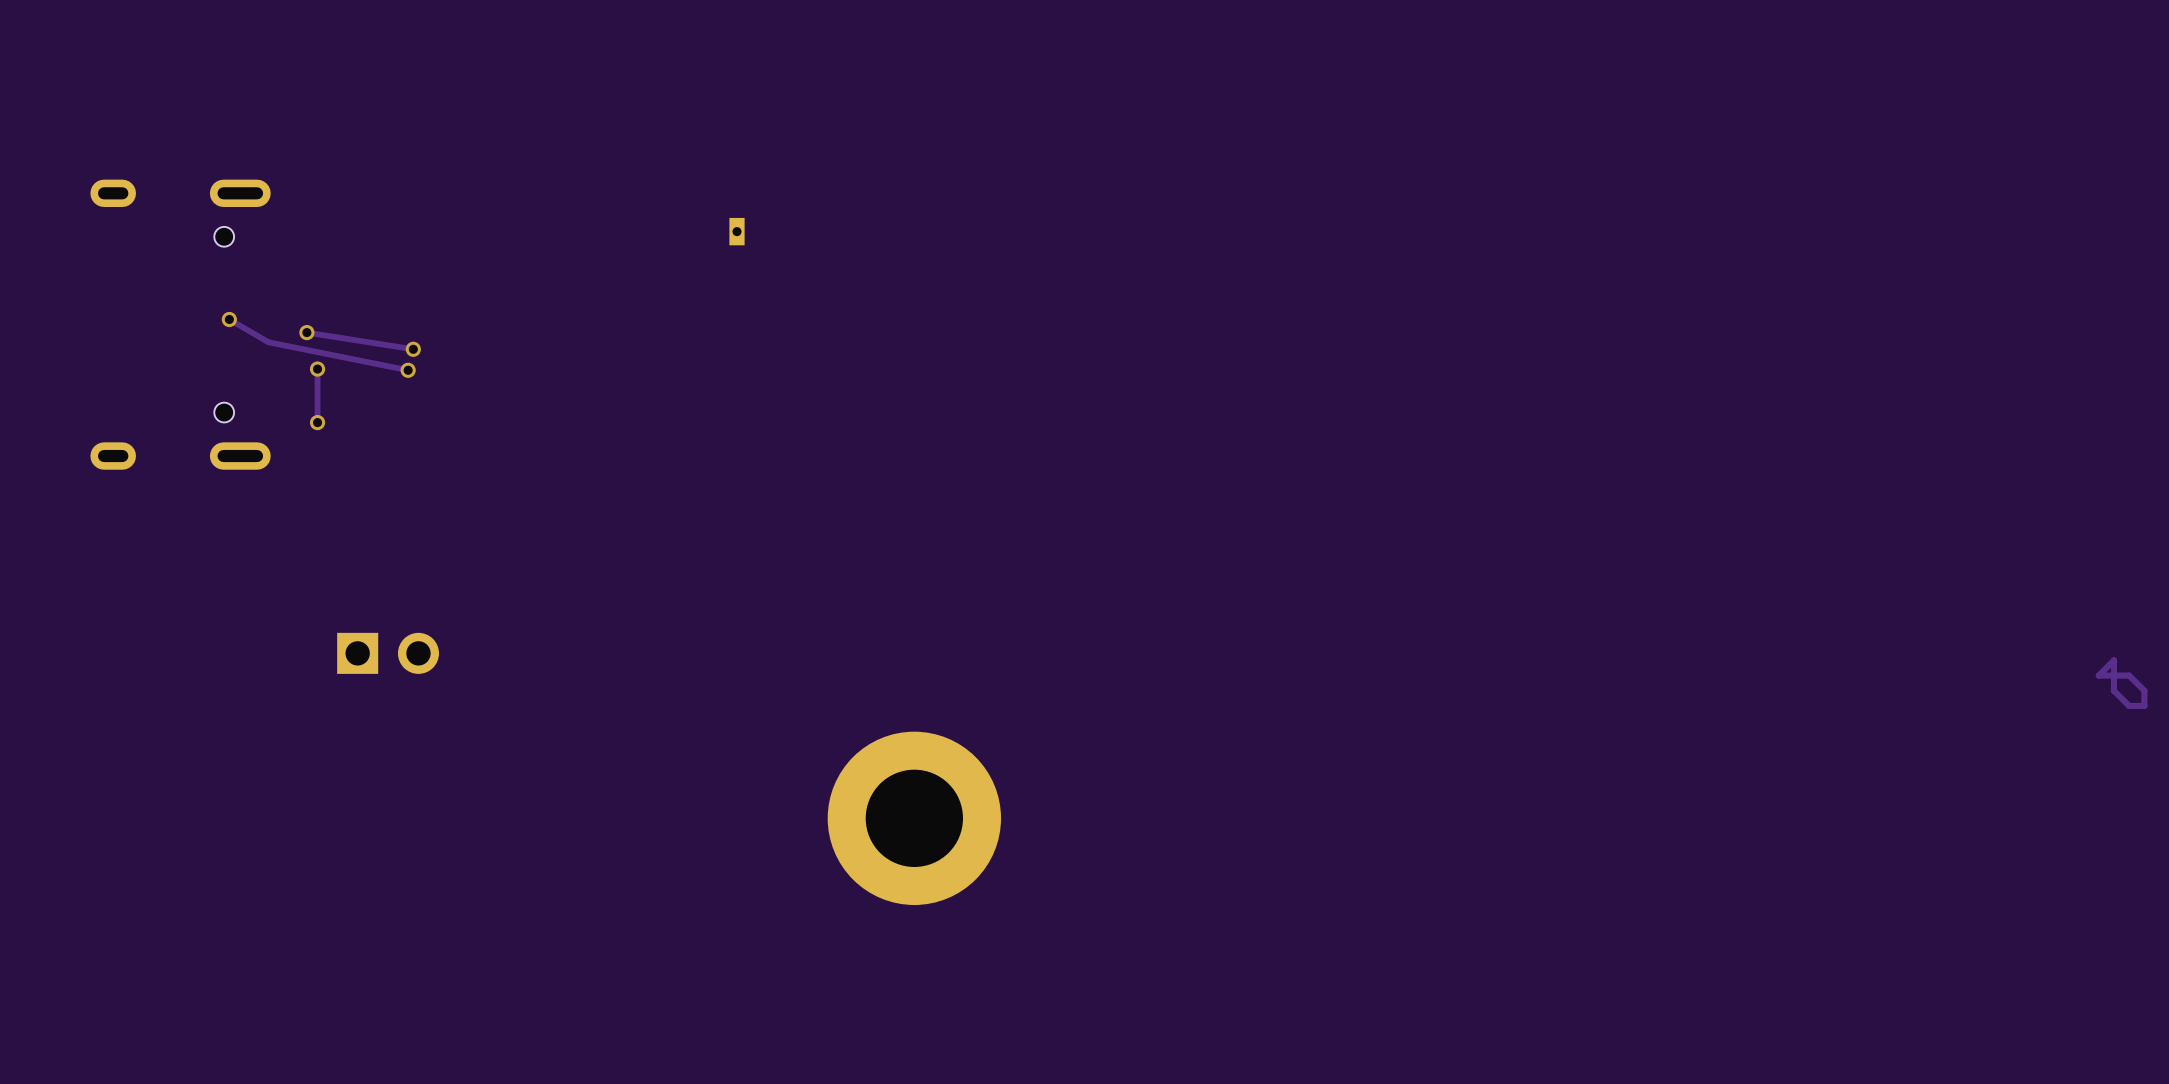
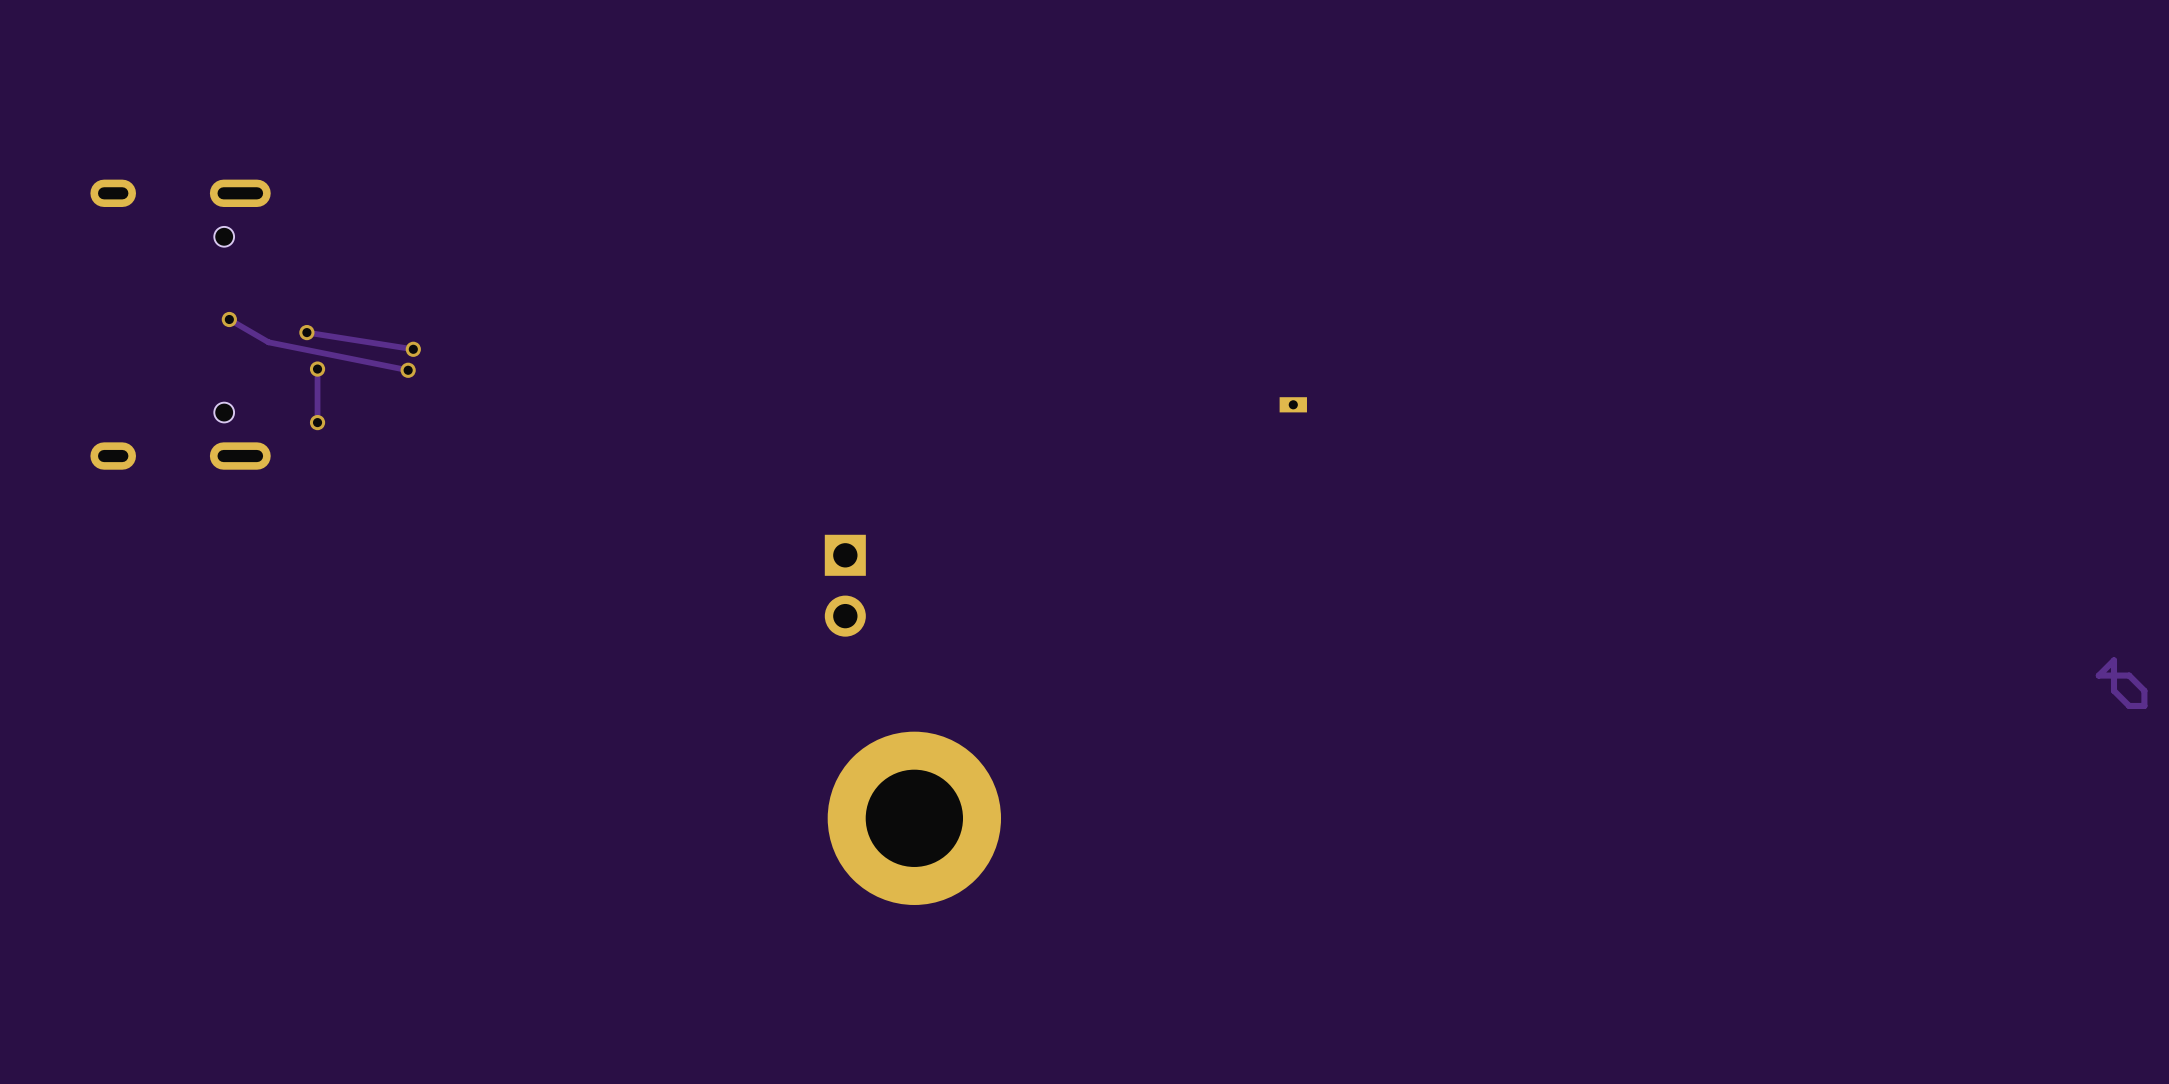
part rotation: 0° (737, 231) -> 90° clockwise (1293, 404)
part position: (737, 231) -> (1293, 404)
part rotation: 0° (388, 653) -> 90° clockwise (845, 585)
part position: (388, 653) -> (845, 585)

